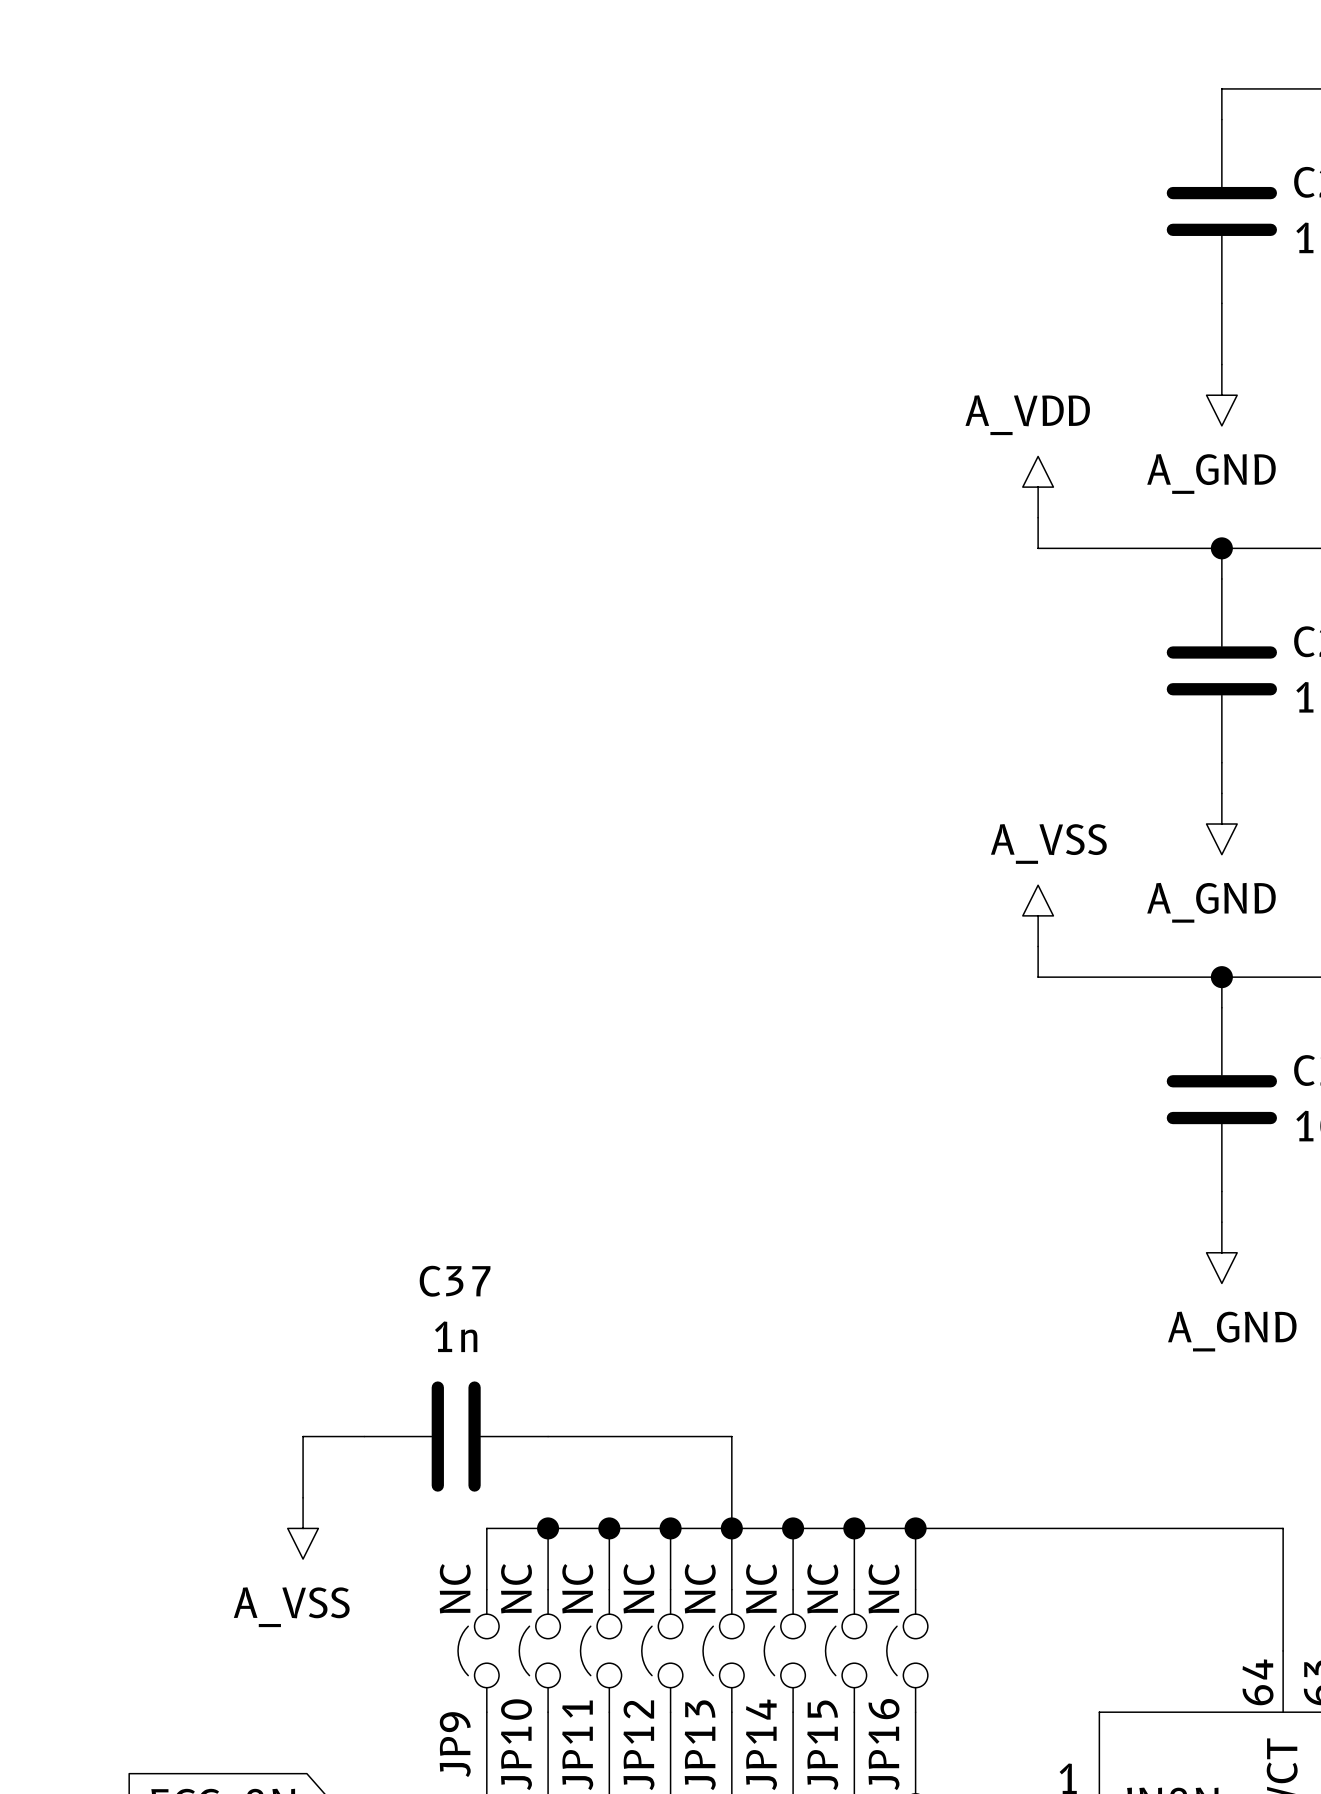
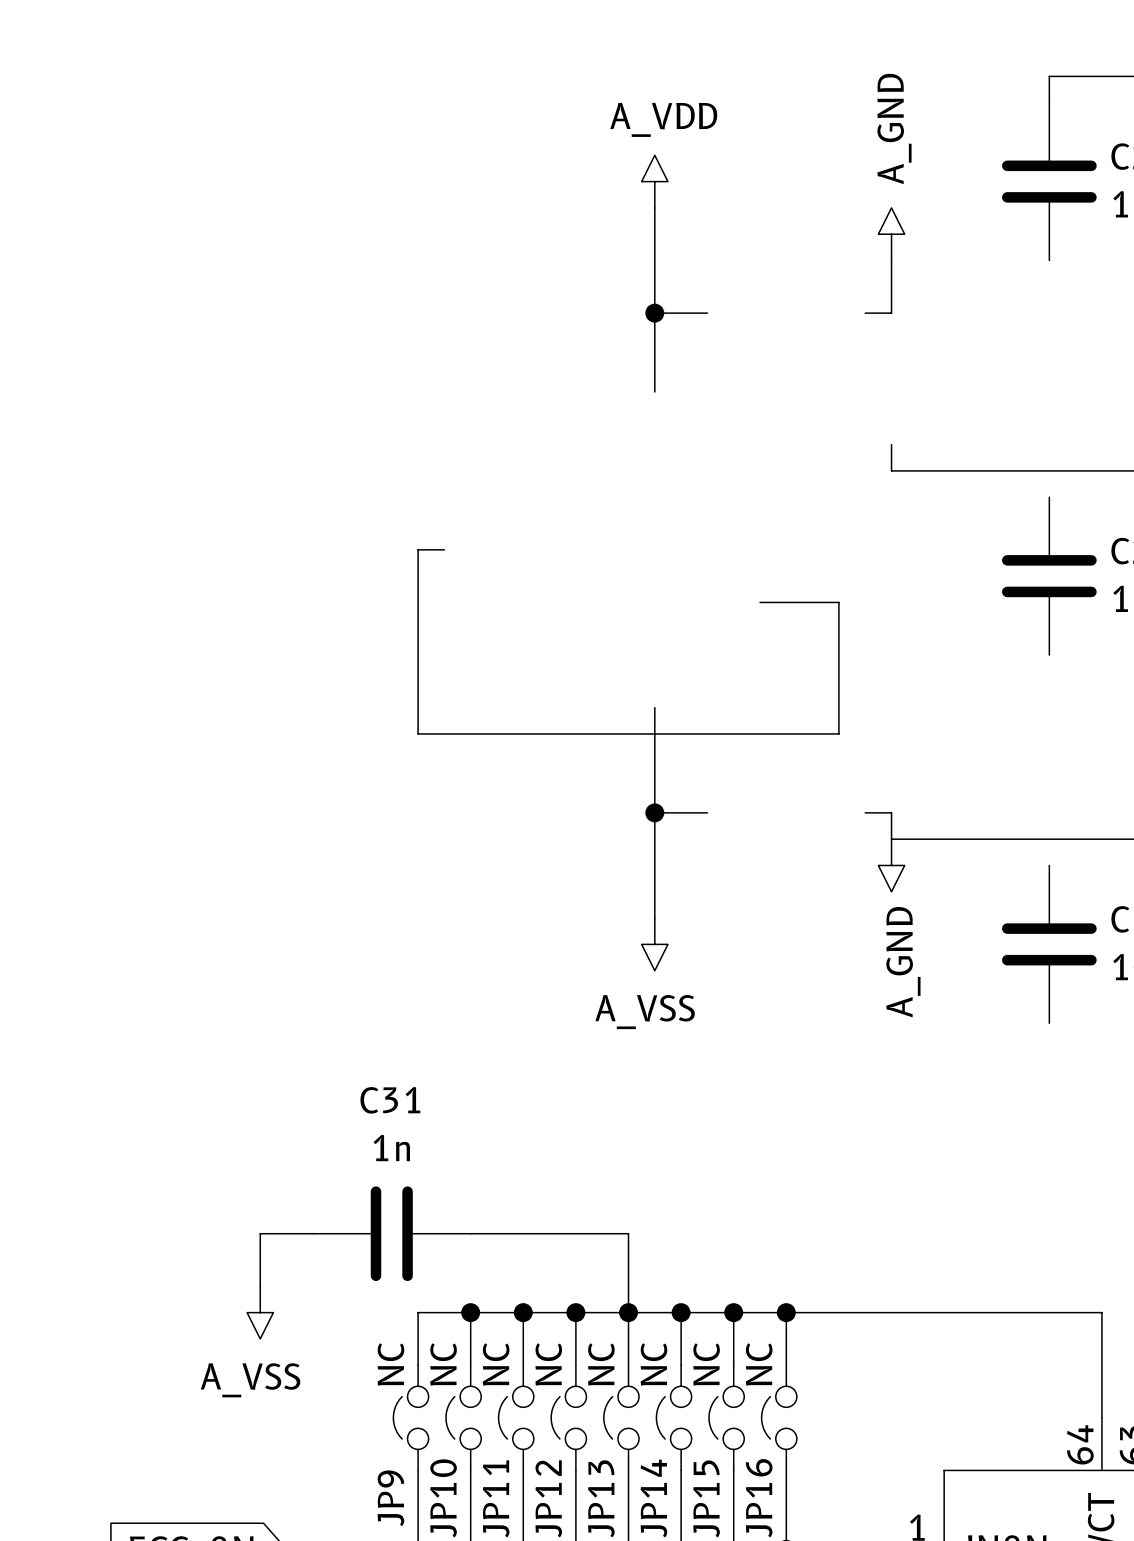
power symbol: none -> A_VDD (654, 181)
wire: none -> (654, 207) (654, 392)
wire: none -> (891, 260) (891, 313) (865, 313)
wire: (1221, 303) (1221, 364) -> none
wire: none -> (654, 313) (707, 313)
junction: none -> (654, 313)
power symbol rotation: 0° (1221, 395) -> 180° (891, 234)
power symbol position: A_GND (1221, 395) -> A_GND (891, 234)
power symbol: A_VDD (1038, 487) -> none
wire: (1221, 548) (1221, 578) -> none
junction: (1221, 548) -> none
wire: none -> (444, 549) (418, 549) (418, 733) (838, 733) (838, 602) (760, 602)
wire: (1221, 762) (1221, 793) -> none
wire: none -> (654, 707) (654, 918)
power symbol: A_GND (1221, 824) -> none
power symbol: A_VSS (1038, 915) -> none
wire: none -> (654, 812) (707, 812)
junction: none -> (654, 812)
wire: none -> (865, 812) (891, 812)
wire: (1221, 977) (1221, 1007) -> none
junction: (1221, 977) -> none
power symbol: none -> A_GND (891, 865)
power symbol: none -> A_VSS (654, 944)
wire: (1221, 1191) (1221, 1222) -> none
power symbol: A_GND (1221, 1252) -> none
C37 name: C37 (455, 1281) -> C31 (390, 1100)

